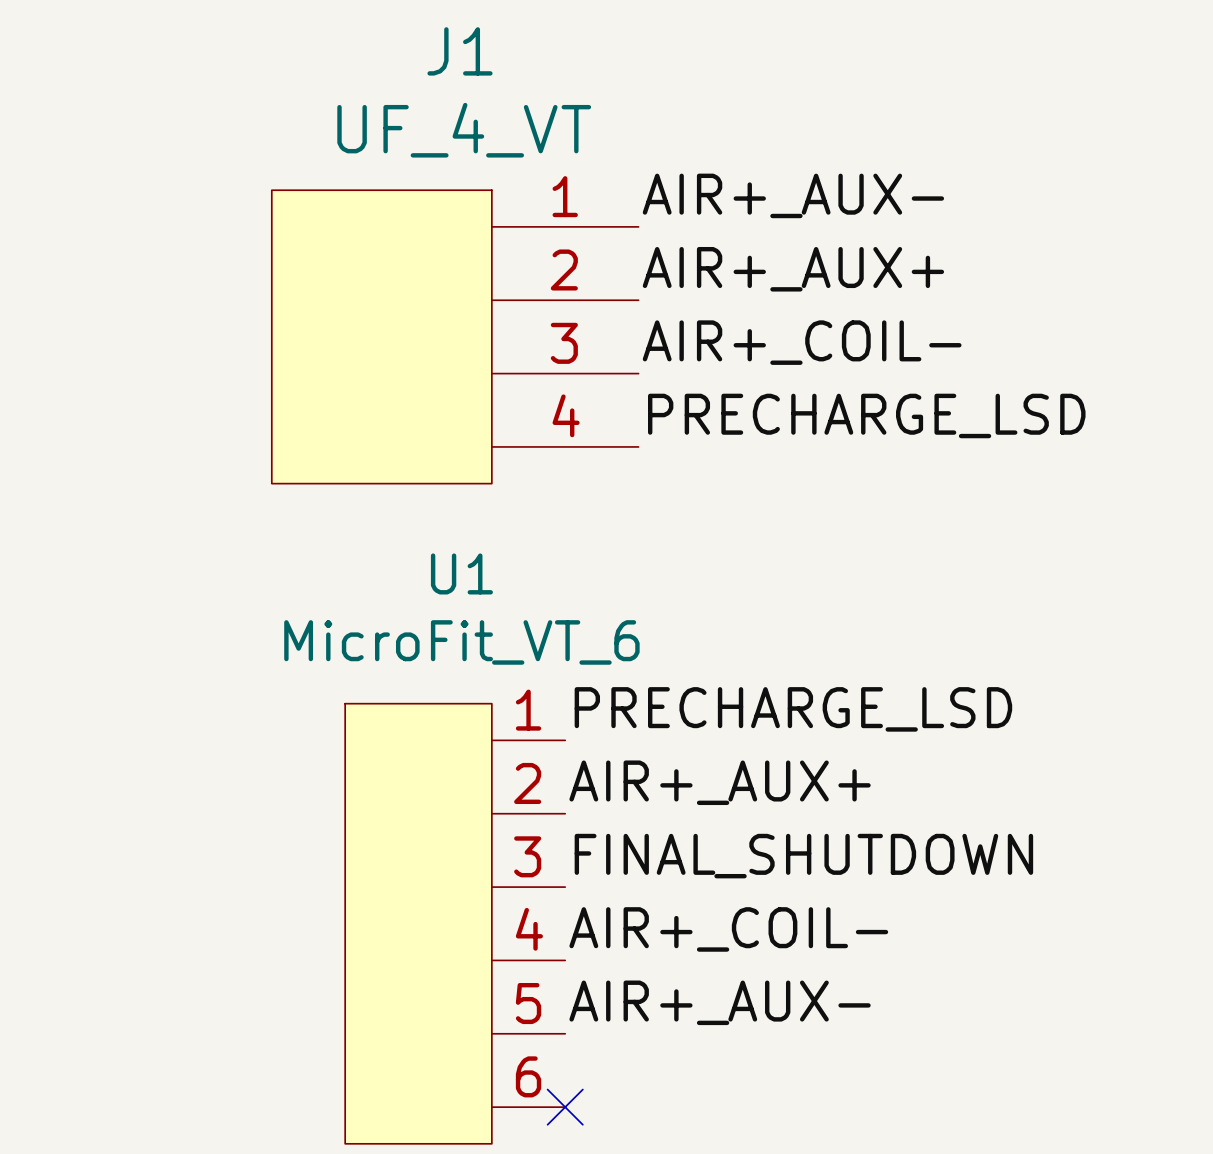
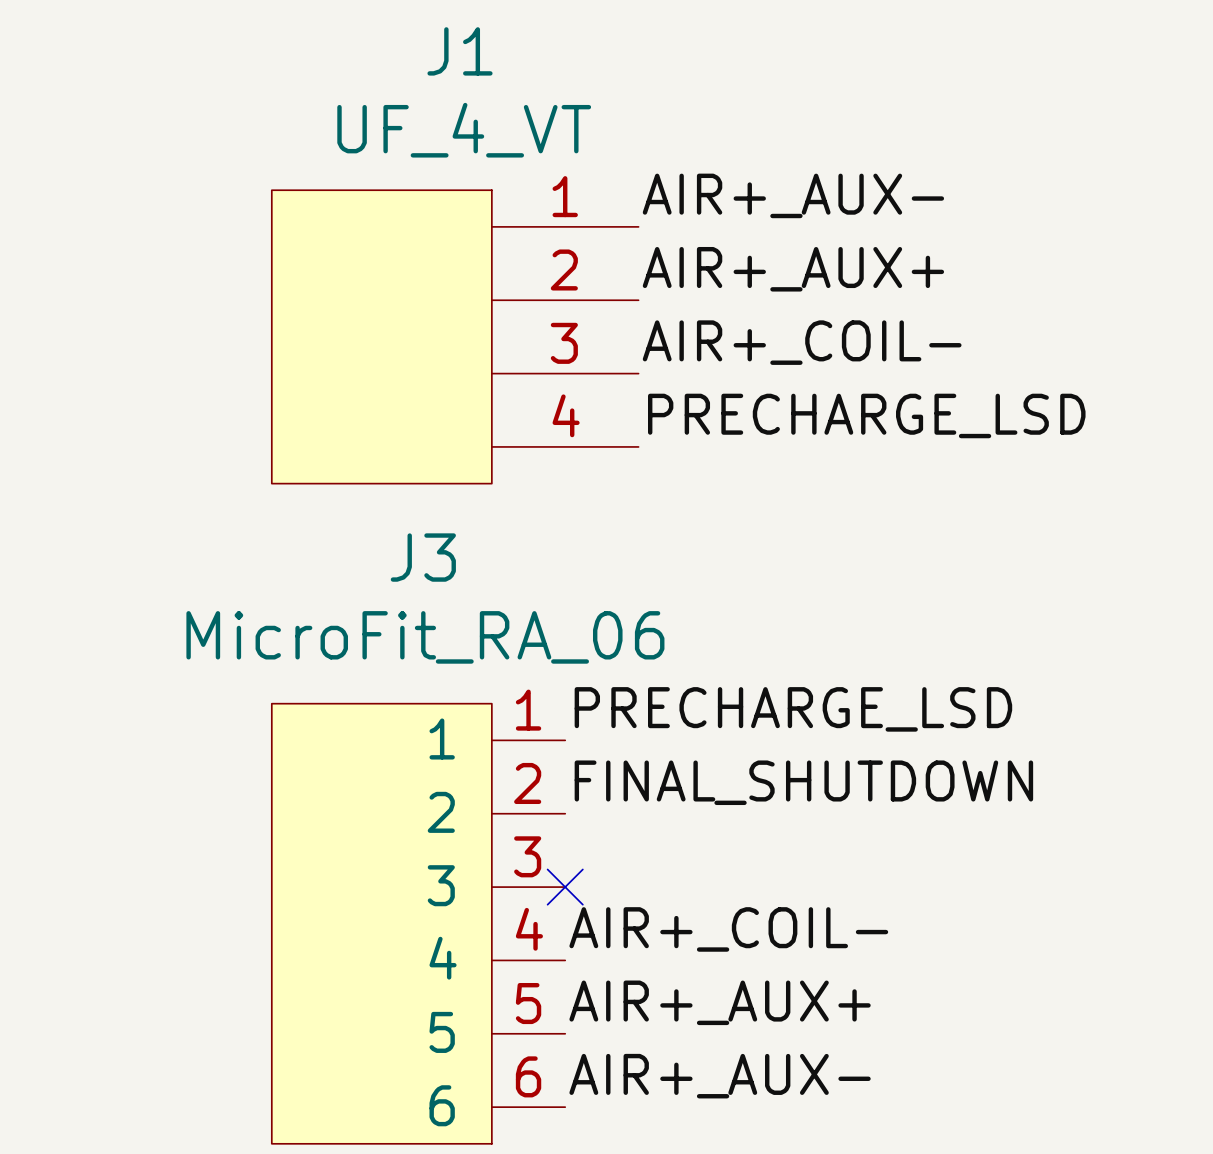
label: AIR+_AUX+ (720, 782) -> FINAL_SHUTDOWN (803, 782)
label: FINAL_SHUTDOWN (803, 856) -> none
no-connect mark: none -> (565, 887)
J3: none -> MicroFit_RA_06 (418, 923)
U1: MicroFit_VT_6 (455, 923) -> none
label: AIR+_AUX- (720, 1002) -> AIR+_AUX+ (720, 1002)
label: none -> AIR+_AUX- (720, 1076)
no-connect mark: (565, 1107) -> none

